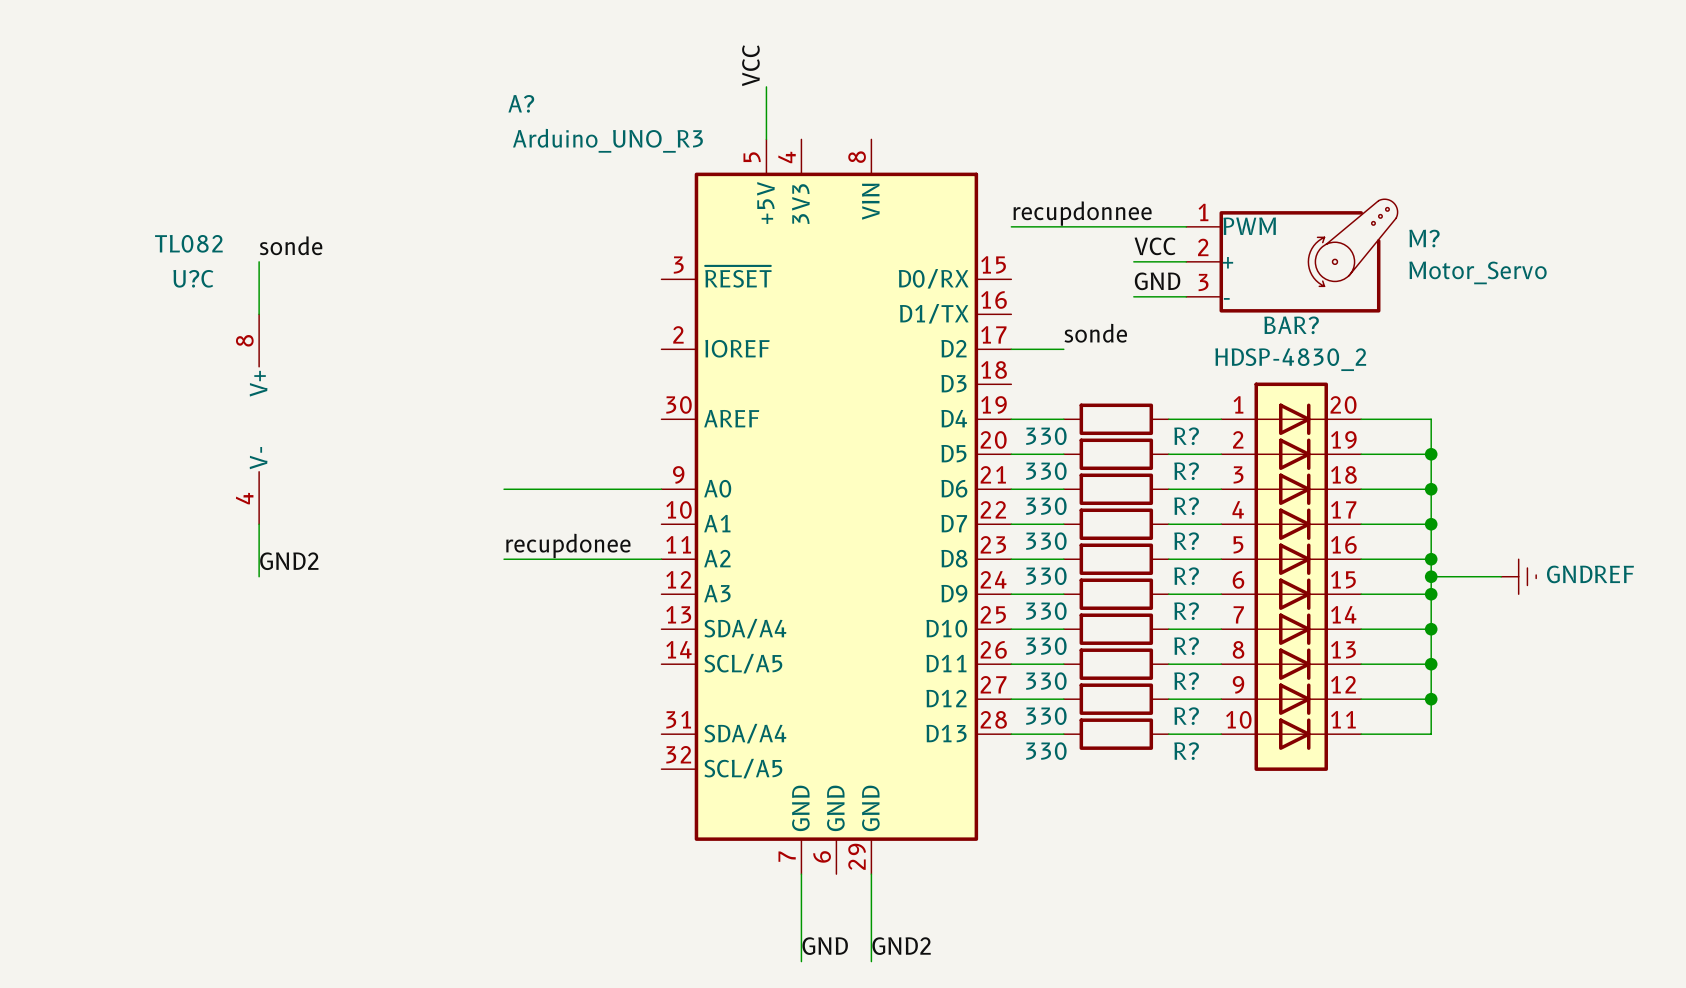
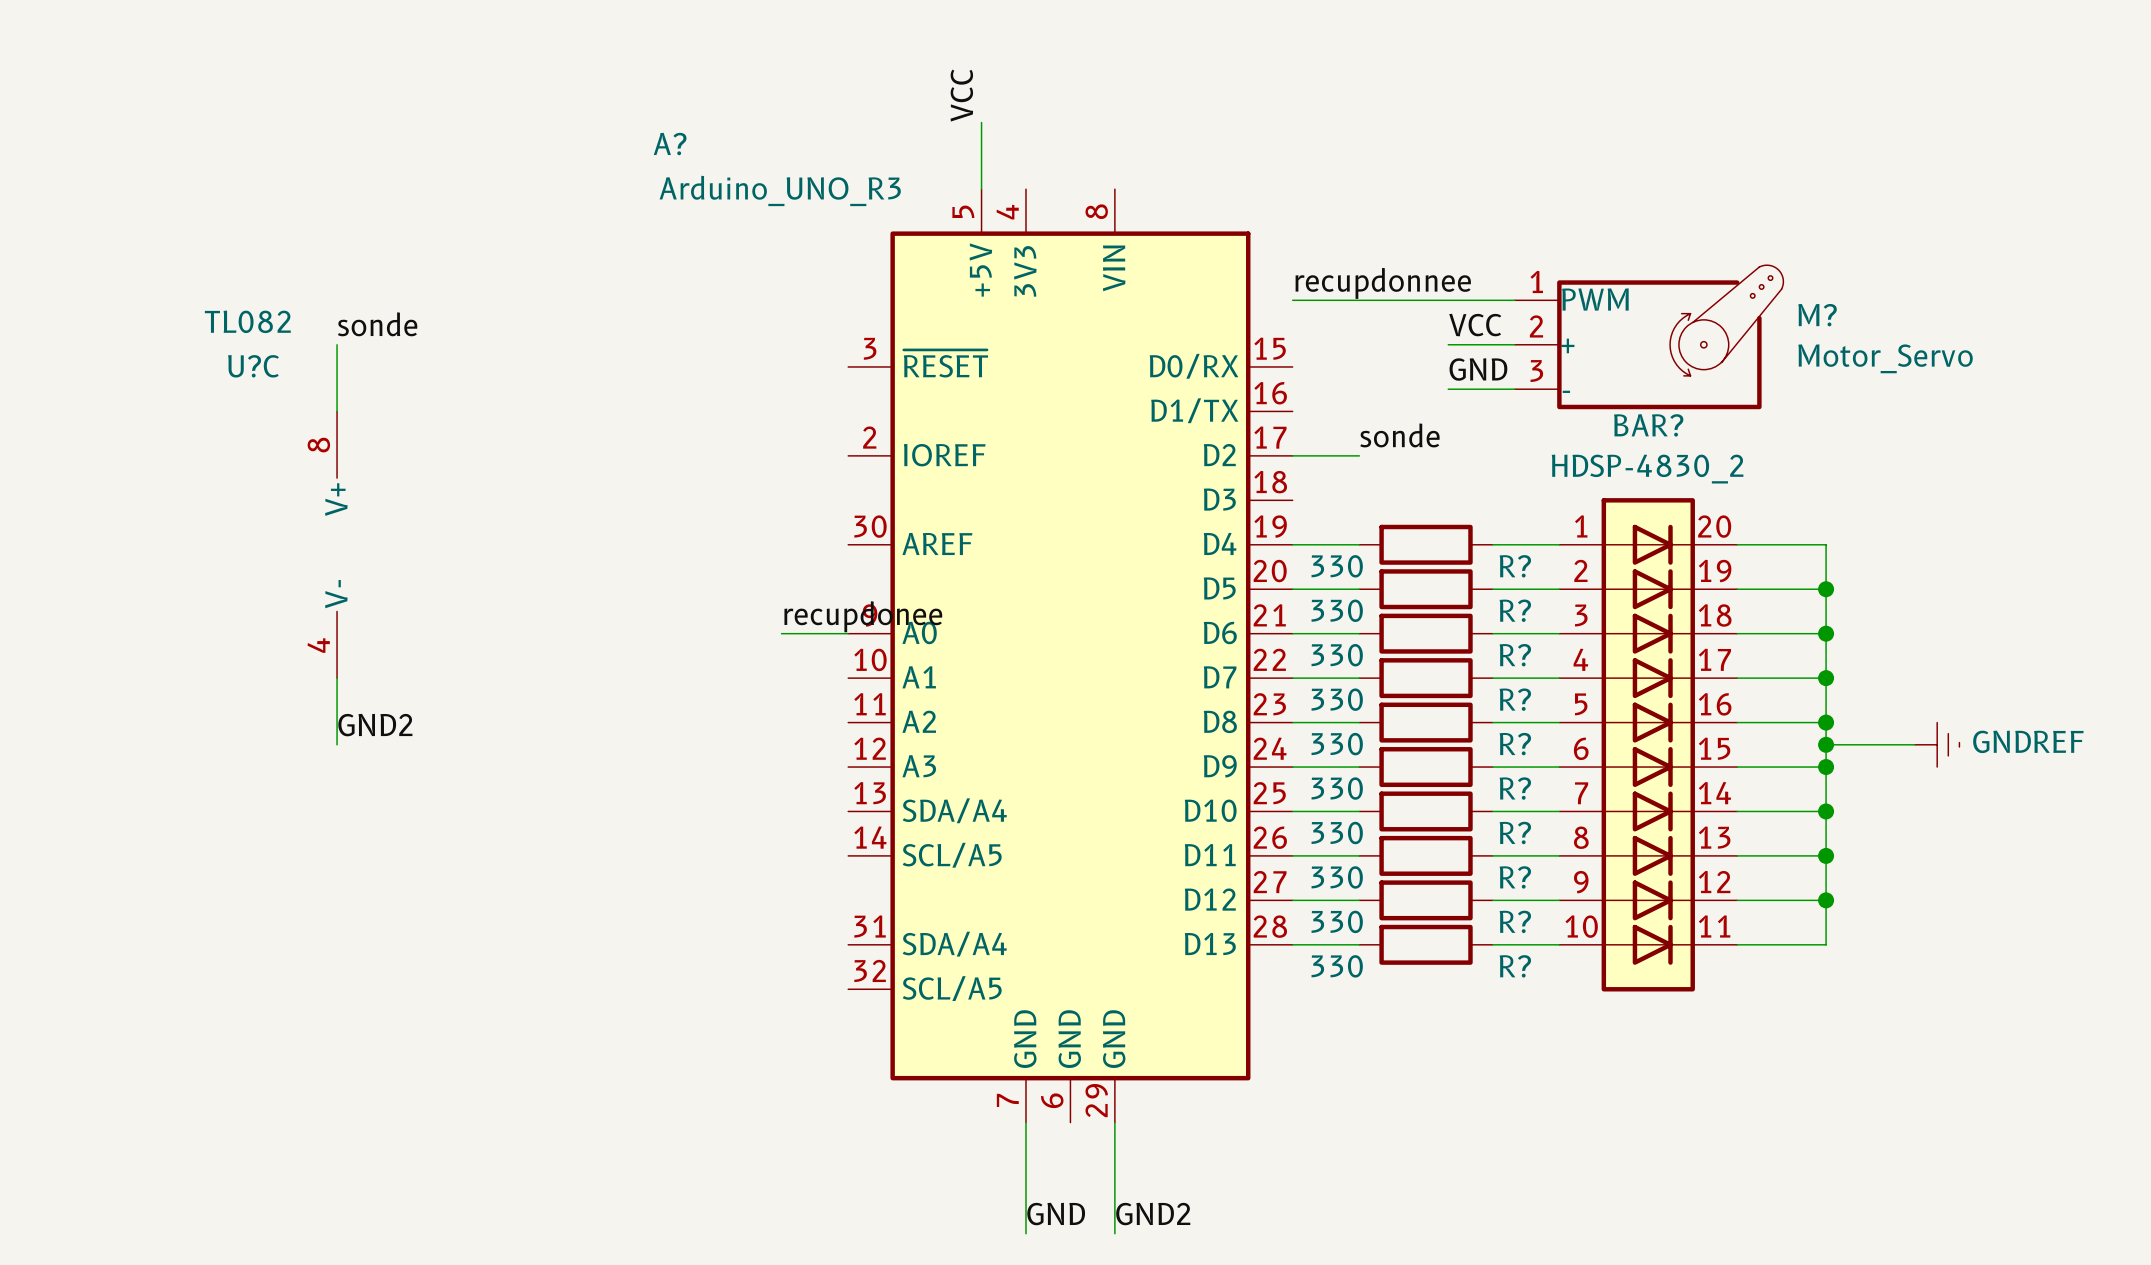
wire: (504, 489) (608, 489) -> none
label position: recupdonee (568, 545) -> recupdonee (863, 616)
wire: (504, 559) (661, 559) -> none

